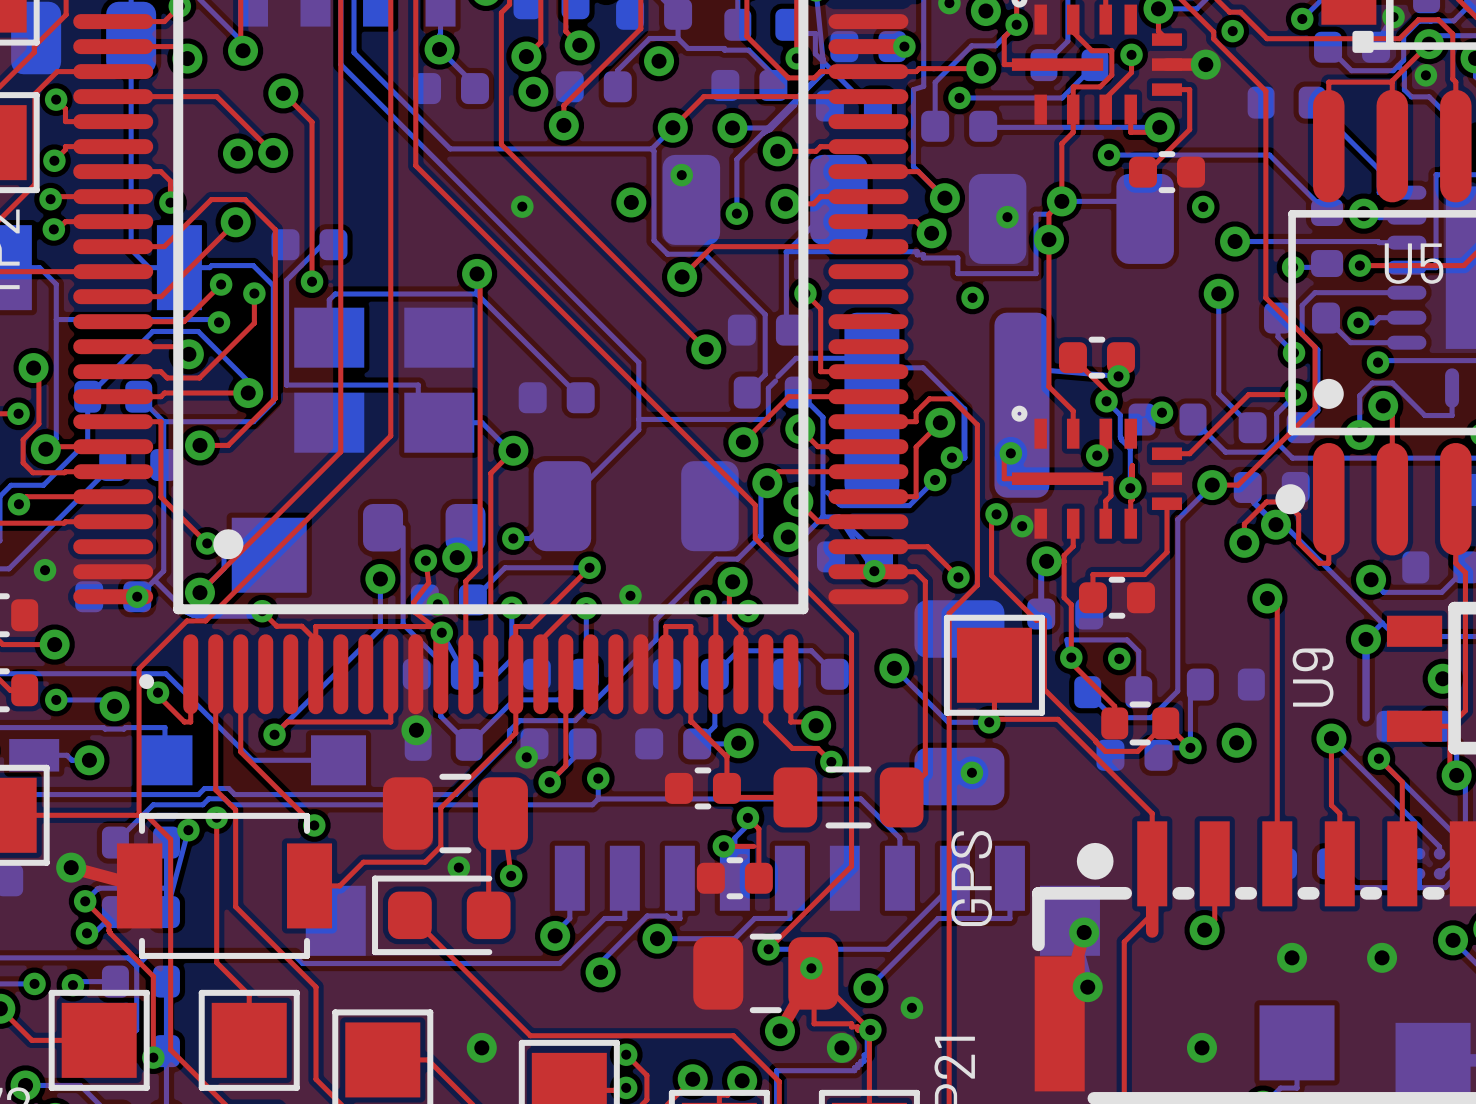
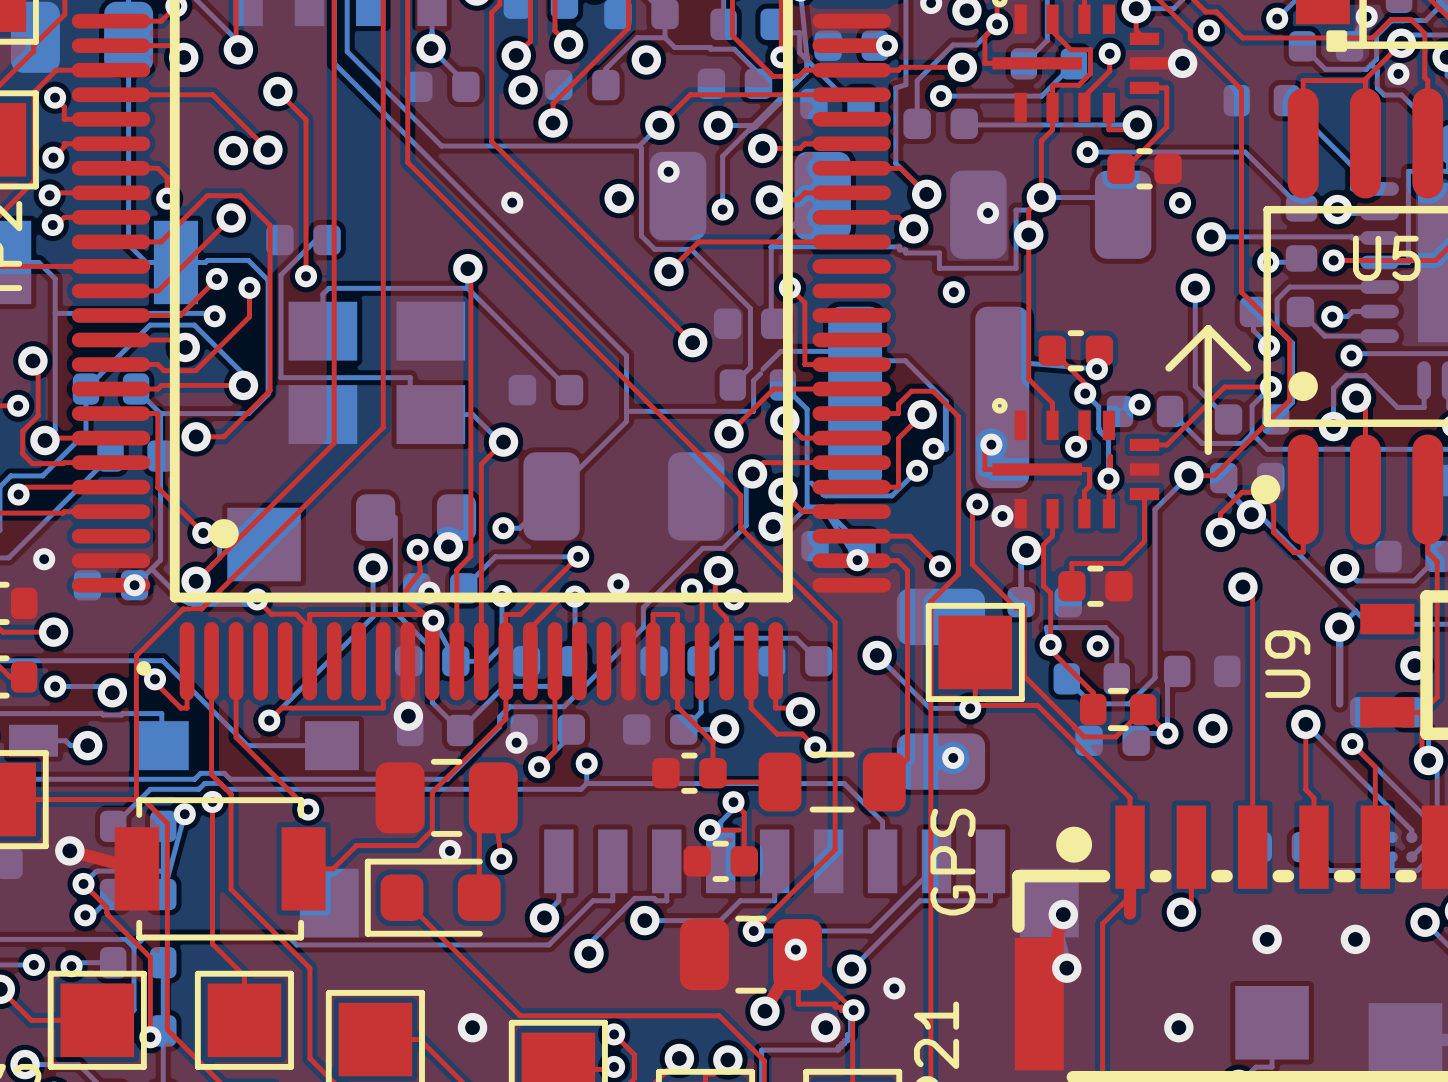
line: none -> (1208, 328) (1169, 367)
line: none -> (1208, 328) (1247, 367)
line: none -> (1208, 328) (1208, 451)

